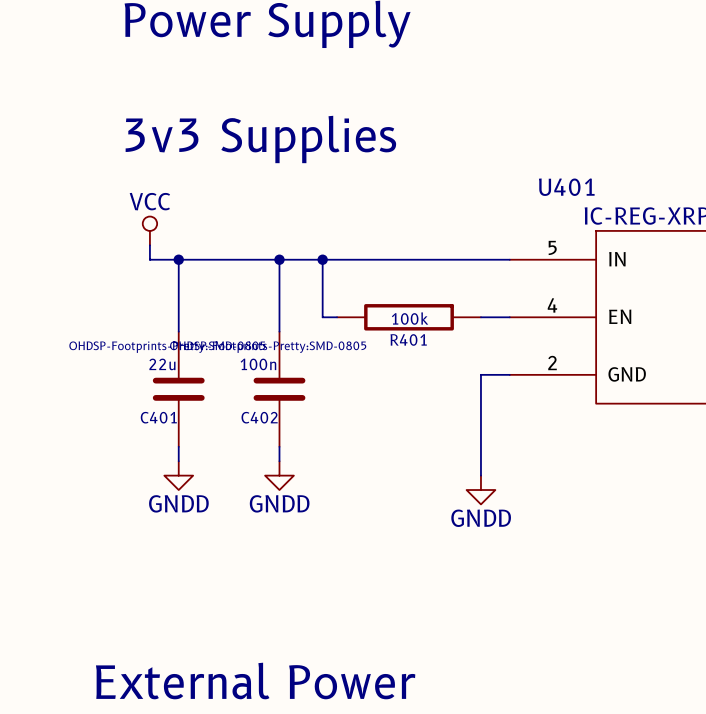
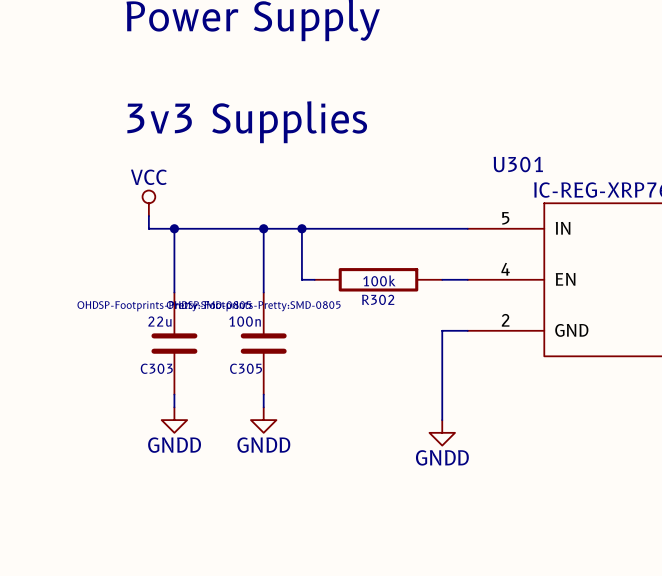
U401 name: U401 (566, 187) -> U301 (518, 164)
R401 name: R401 (408, 339) -> R302 (378, 299)
C401 name: C401 (158, 417) -> C303 (156, 368)
C402 name: C402 (259, 417) -> C305 (246, 368)

